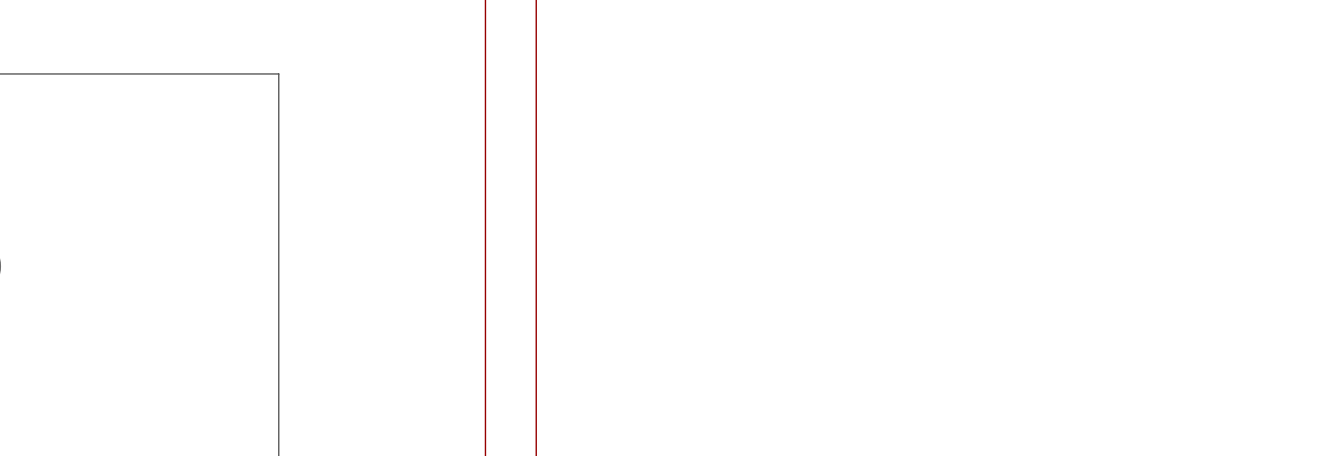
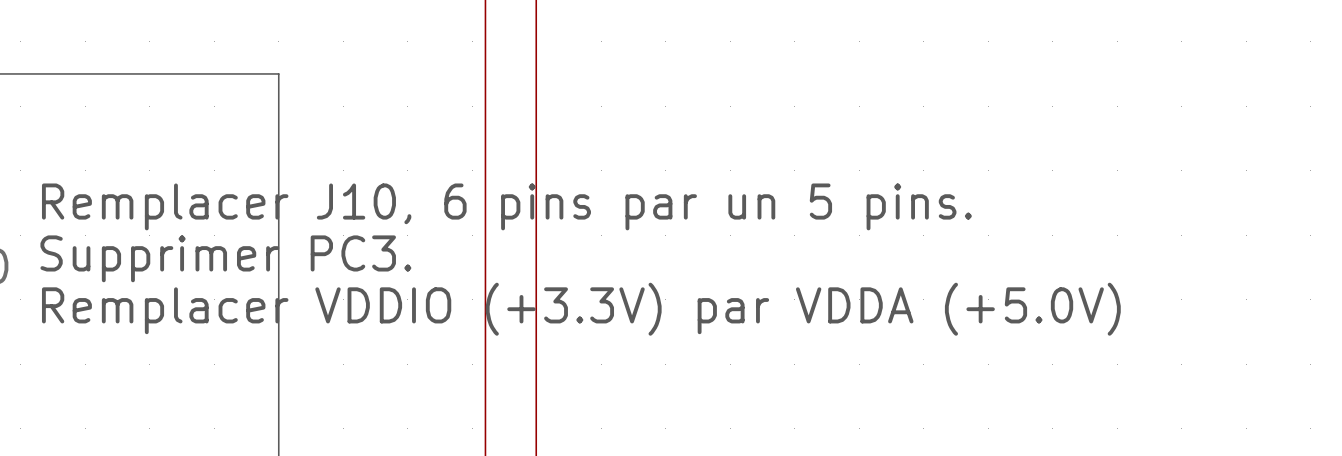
text: none -> Remplacer J10, 6 pins par un 5 pins. (506, 206)
text: none -> Supprimer PC3. (225, 258)
text: none -> Remplacer VDDIO (+3.3V) par VDDA (+5.0V) (581, 309)

